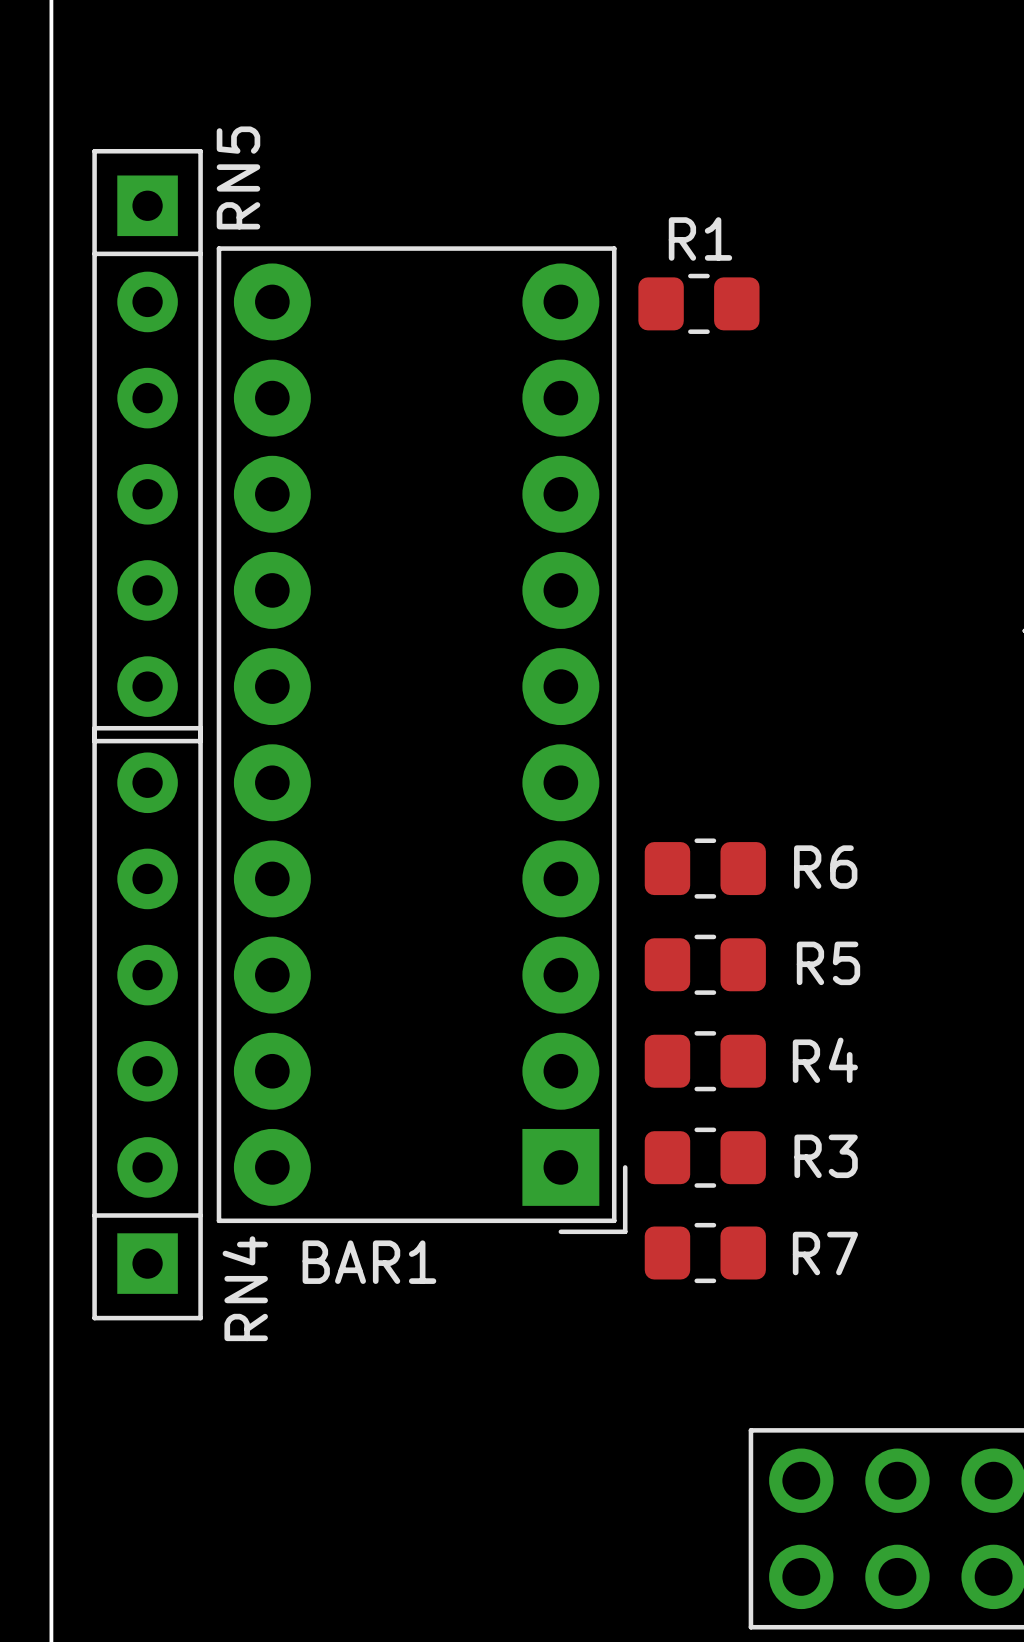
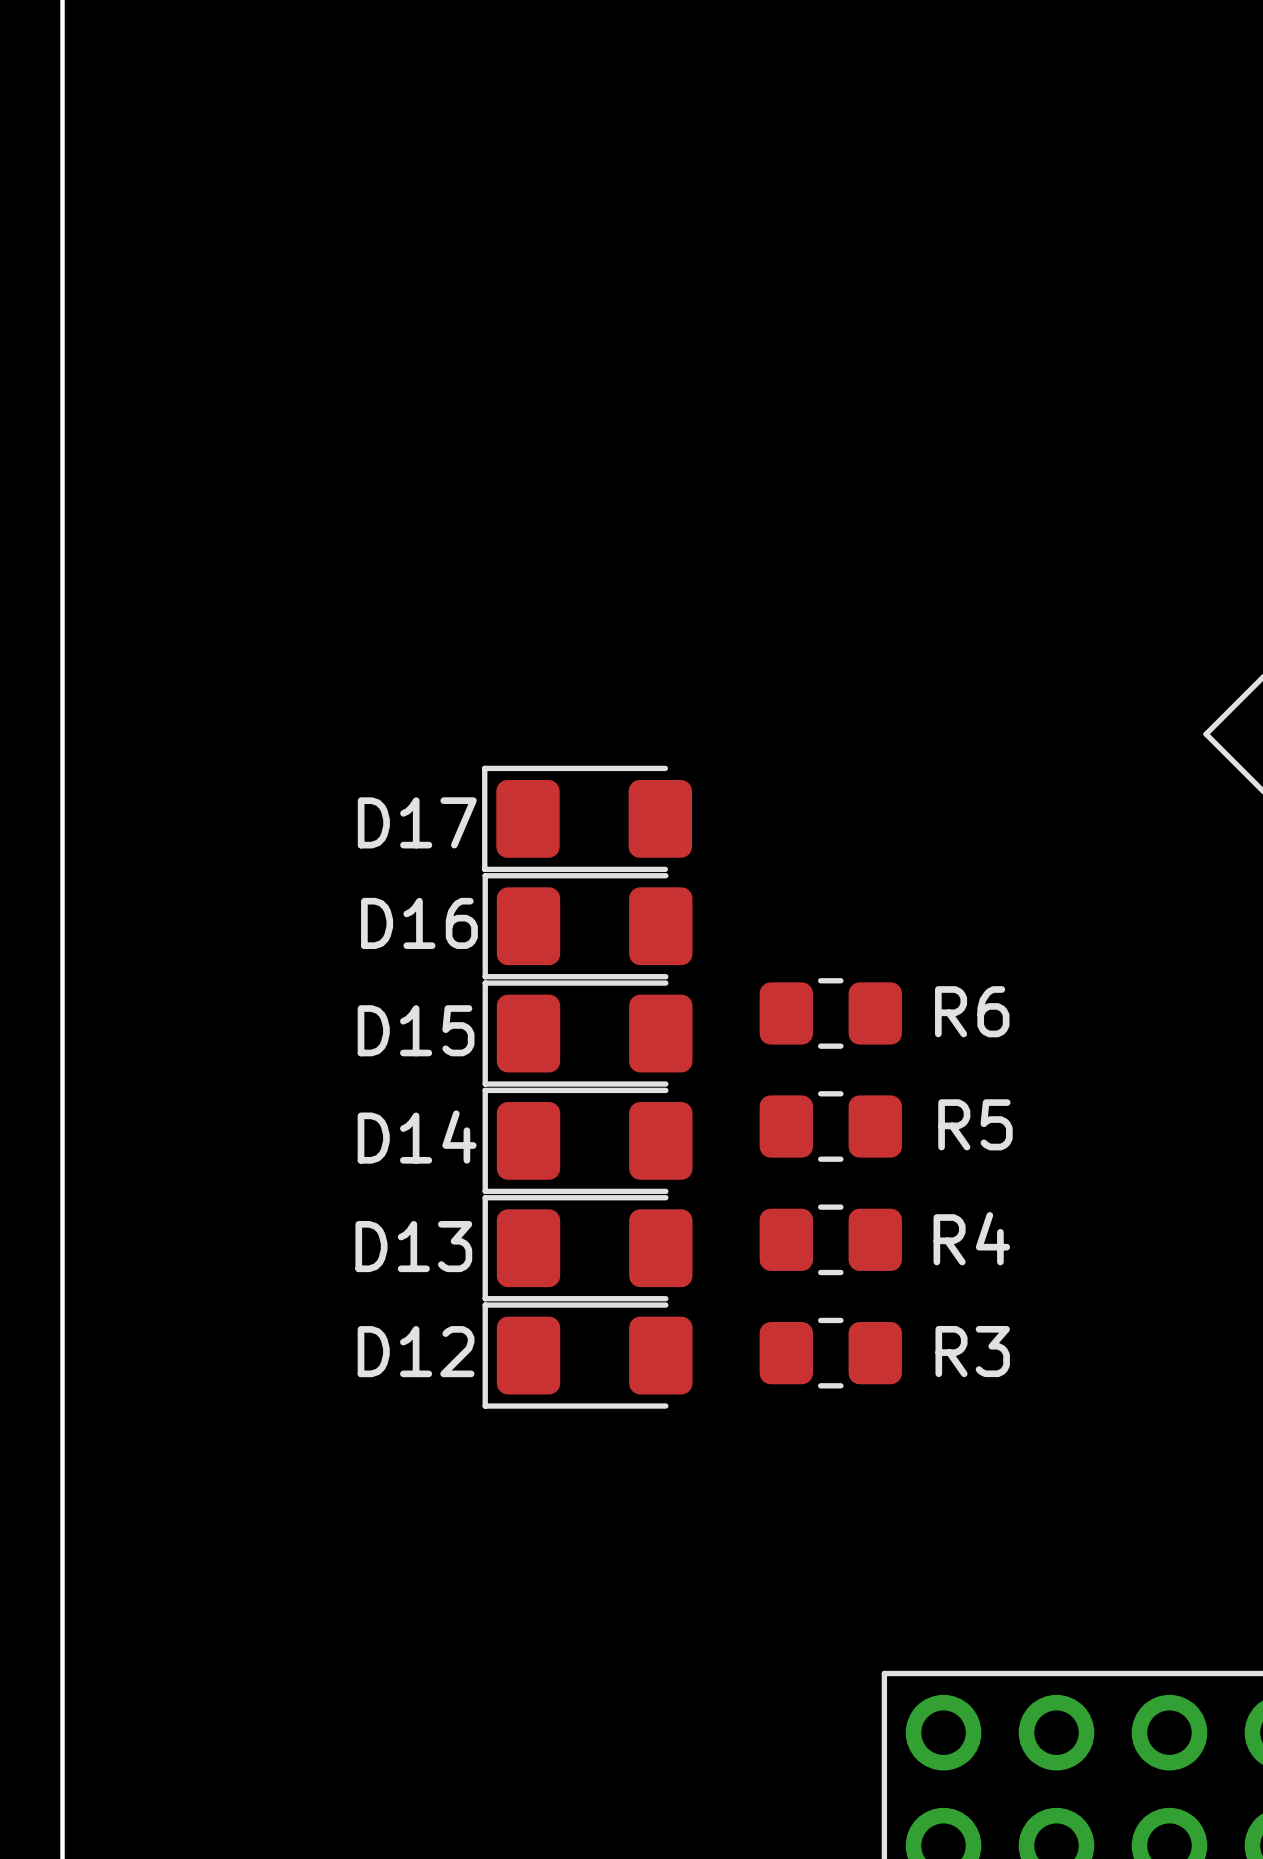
R1: (698, 303) -> none
RN5: (147, 446) -> none
D17: none -> (587, 818)
BAR1: (422, 740) -> none
D16: none -> (587, 926)
D15: none -> (587, 1033)
D14: none -> (587, 1140)
RN4: (147, 1023) -> none
D13: none -> (587, 1248)
D12: none -> (587, 1355)
R7: (705, 1253) -> none

